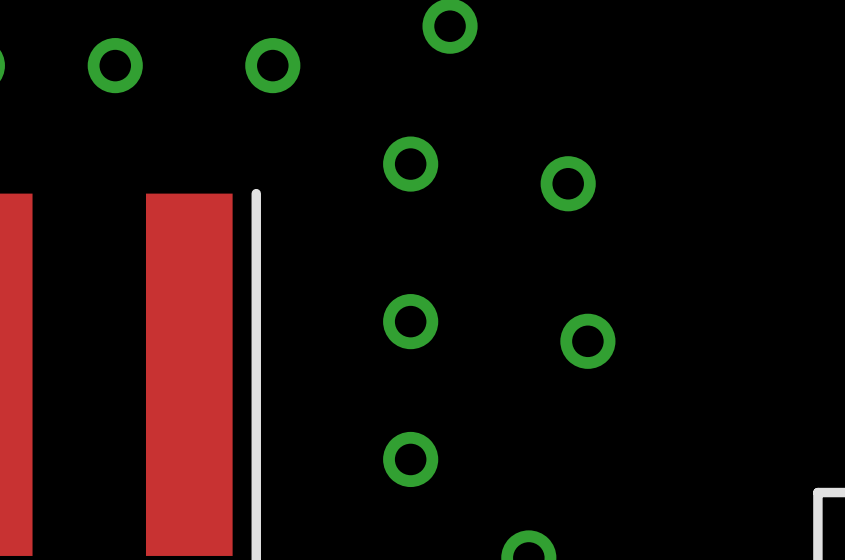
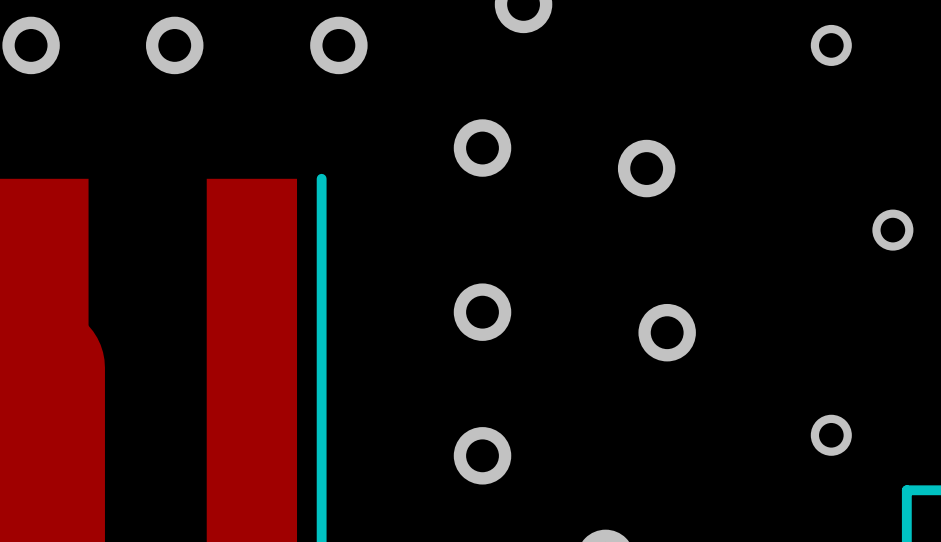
via: none -> (831, 45)
via: none -> (892, 230)
via: none -> (831, 435)

